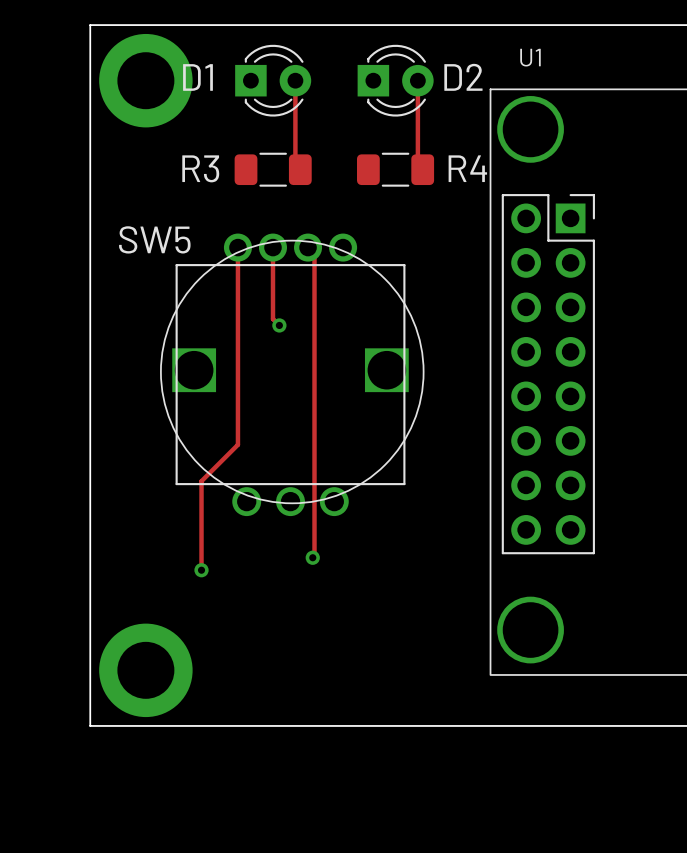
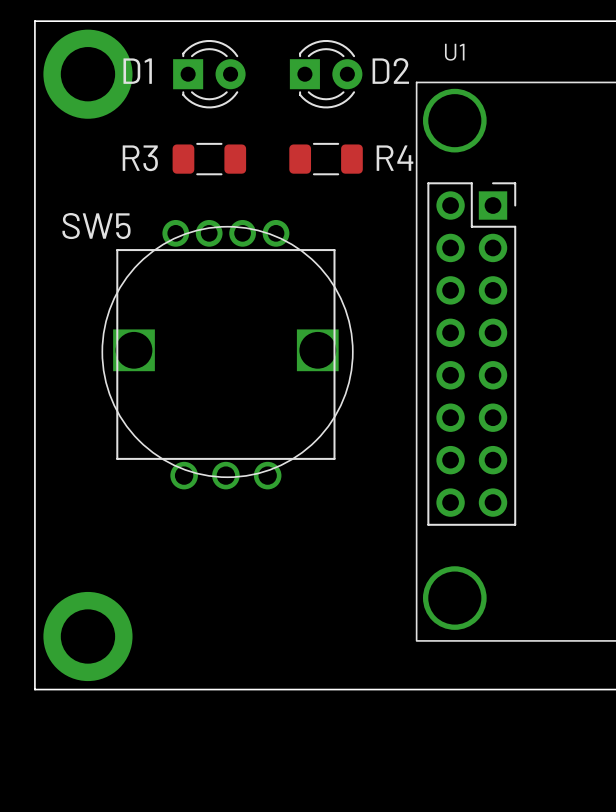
track: (295, 80) (295, 164) (300, 169) -> none
track: (417, 80) (417, 164) (422, 169) -> none
track: (237, 247) (237, 444) (201, 481) (201, 570) -> none
track: (272, 247) (272, 319) (279, 325) -> none
track: (308, 247) (314, 254) (314, 557) (312, 557) -> none
via: (279, 325) -> none
via: (312, 557) -> none
via: (201, 570) -> none

